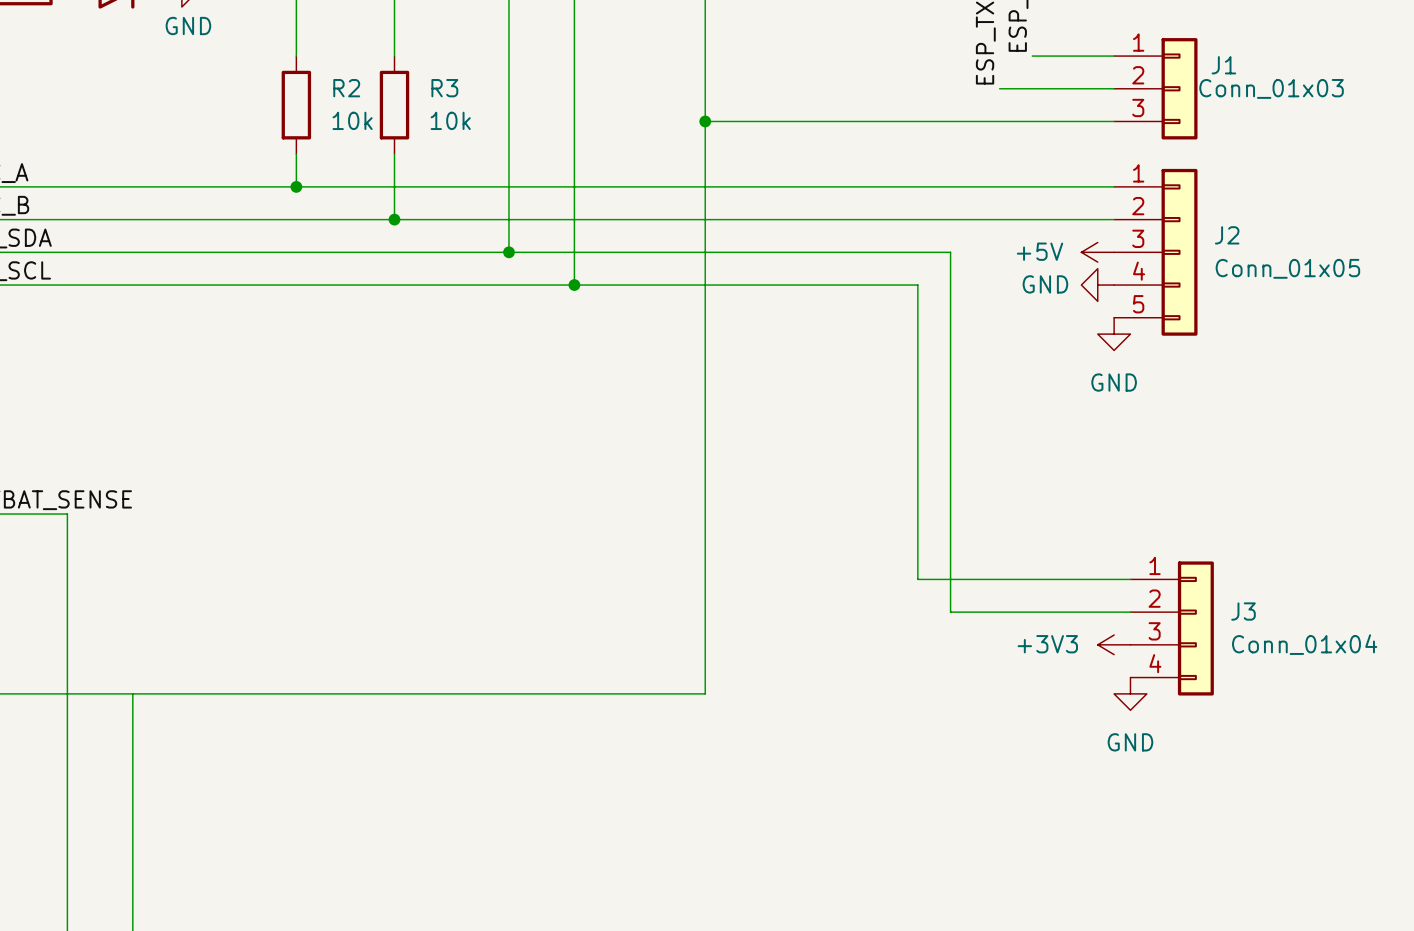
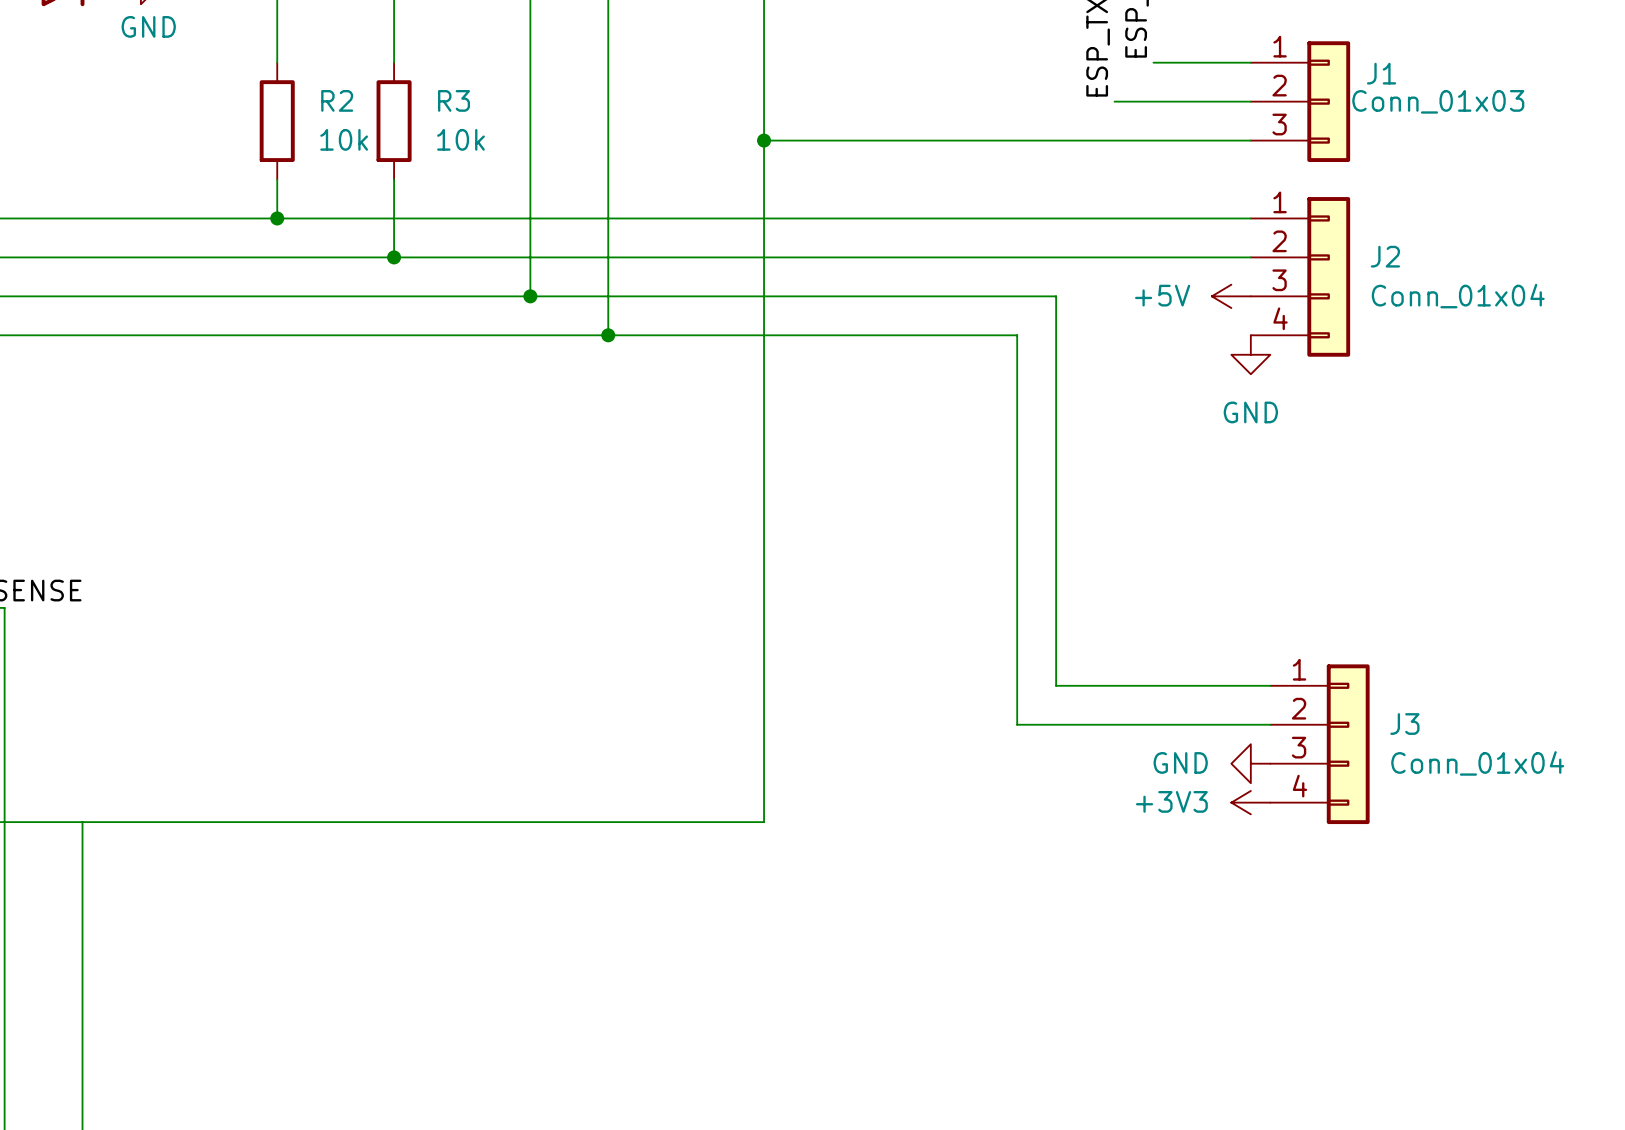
J2 symbol: [1114, 168, 1198, 336] -> [1250, 197, 1351, 357]
J2 value: Conn_01x05 (1287, 268) -> Conn_01x04 (1458, 296)
power symbol: GND (1097, 285) -> none
power symbol: none -> GND (1250, 354)
power symbol: GND (1114, 334) -> none
wire: (917, 579) (950, 579) (950, 612) -> (1017, 685) (1017, 724) (1056, 724)
power symbol: +3V3 (1114, 644) -> GND (1250, 763)
power symbol: none -> +3V3 (1250, 802)
power symbol: GND (1130, 693) -> none

